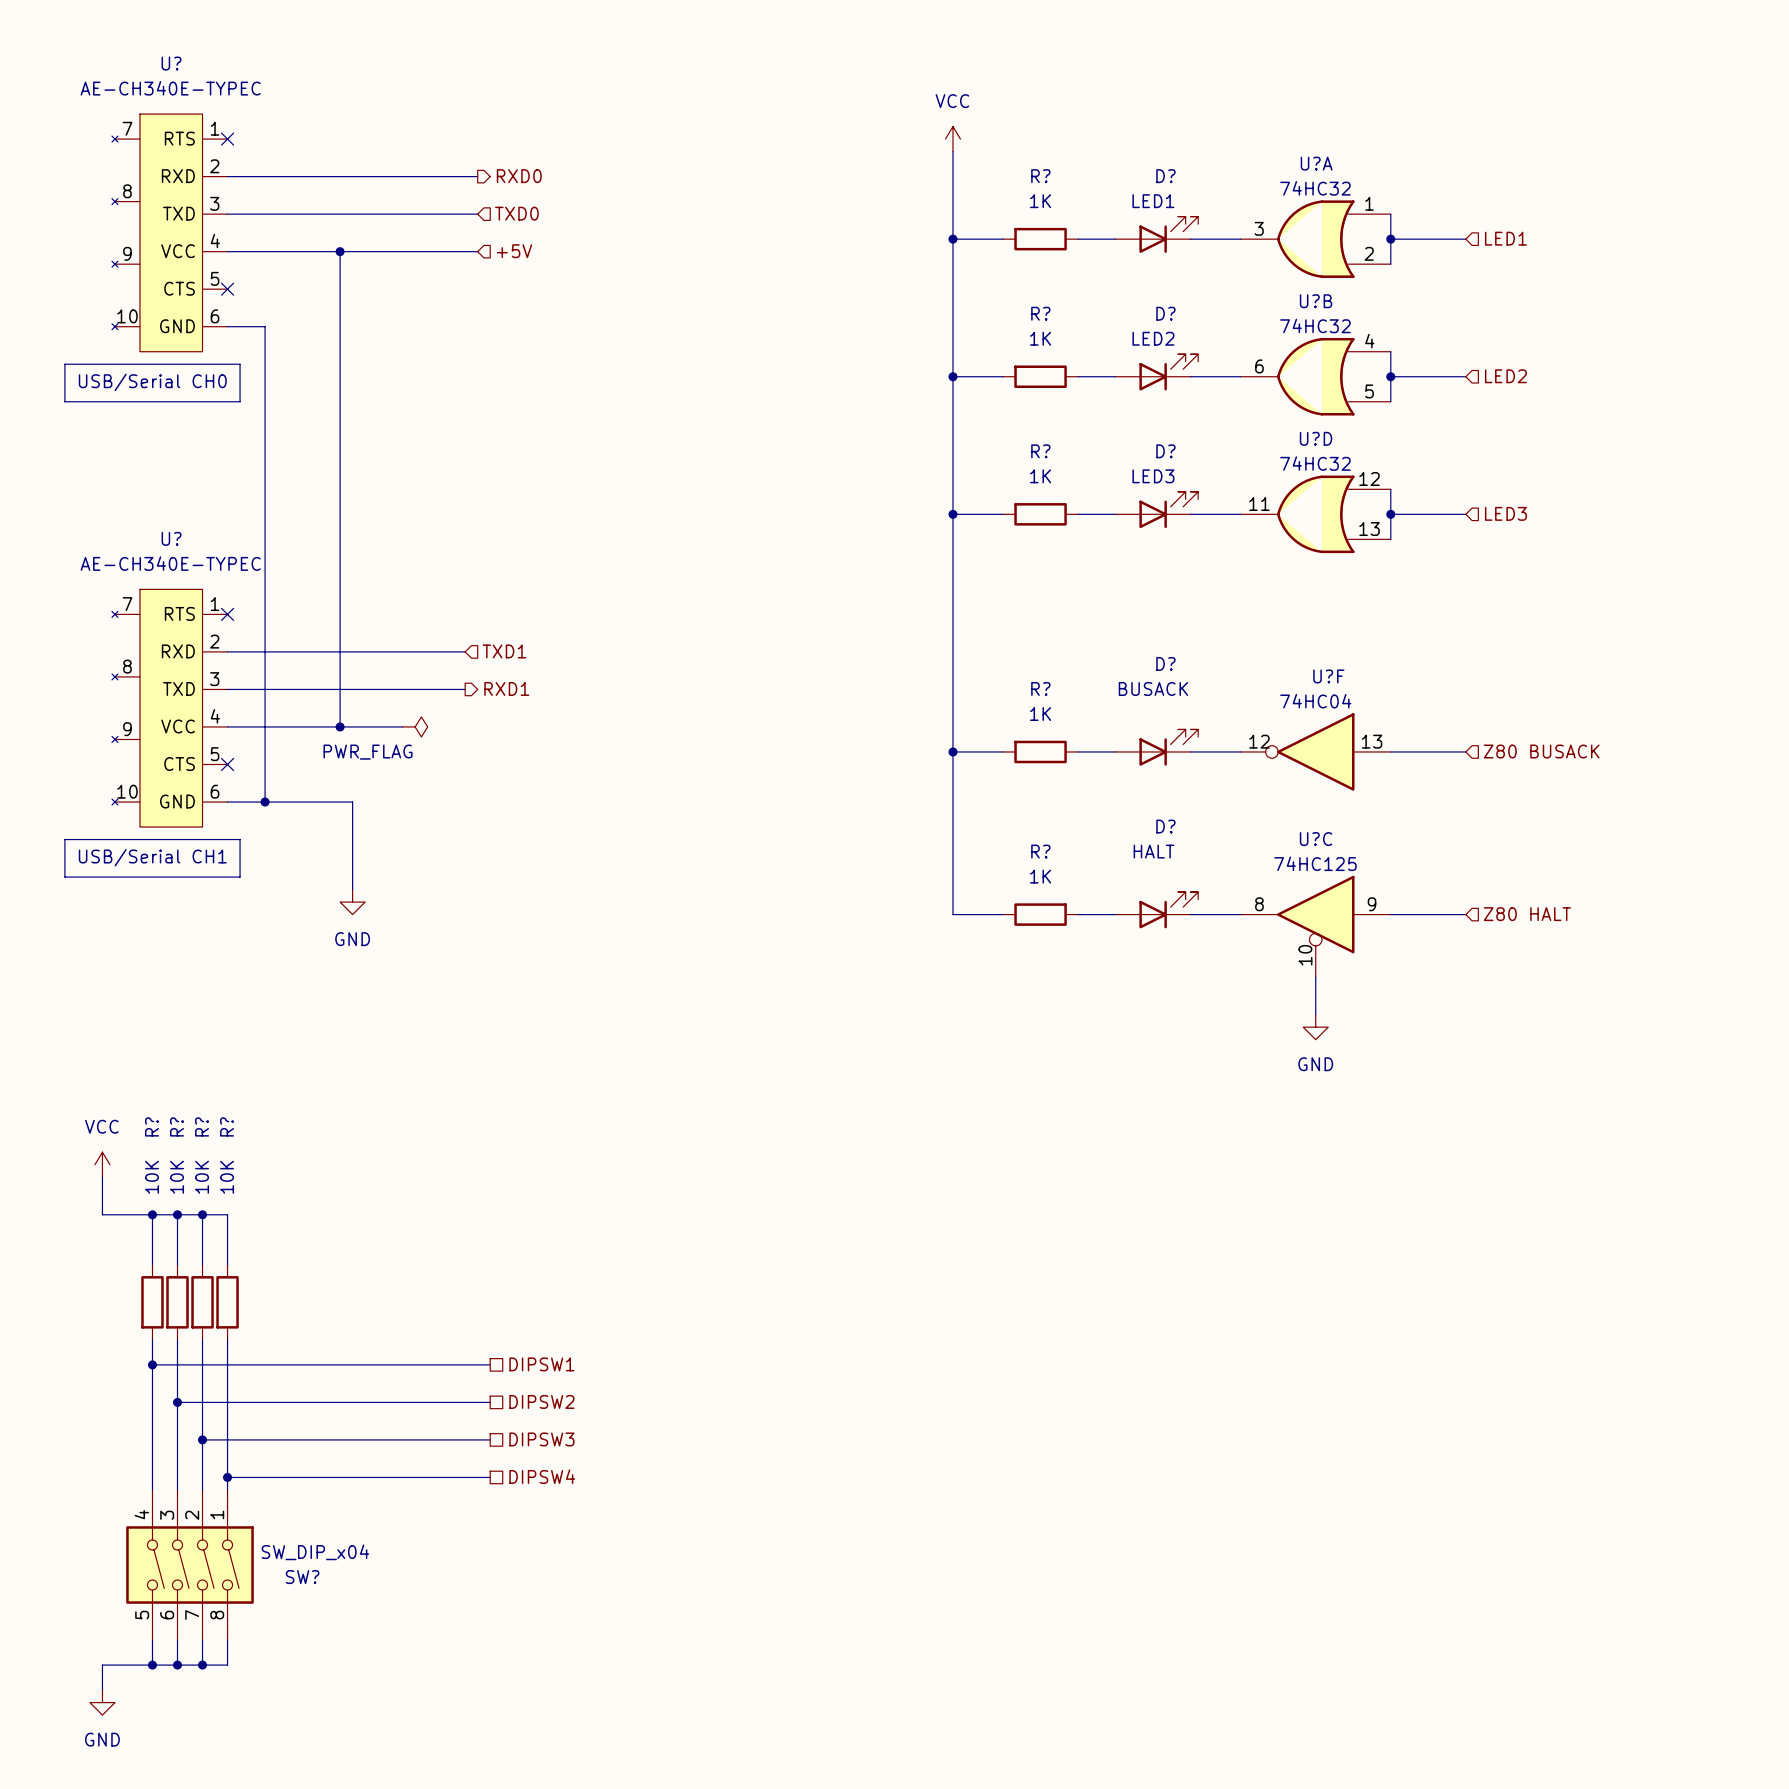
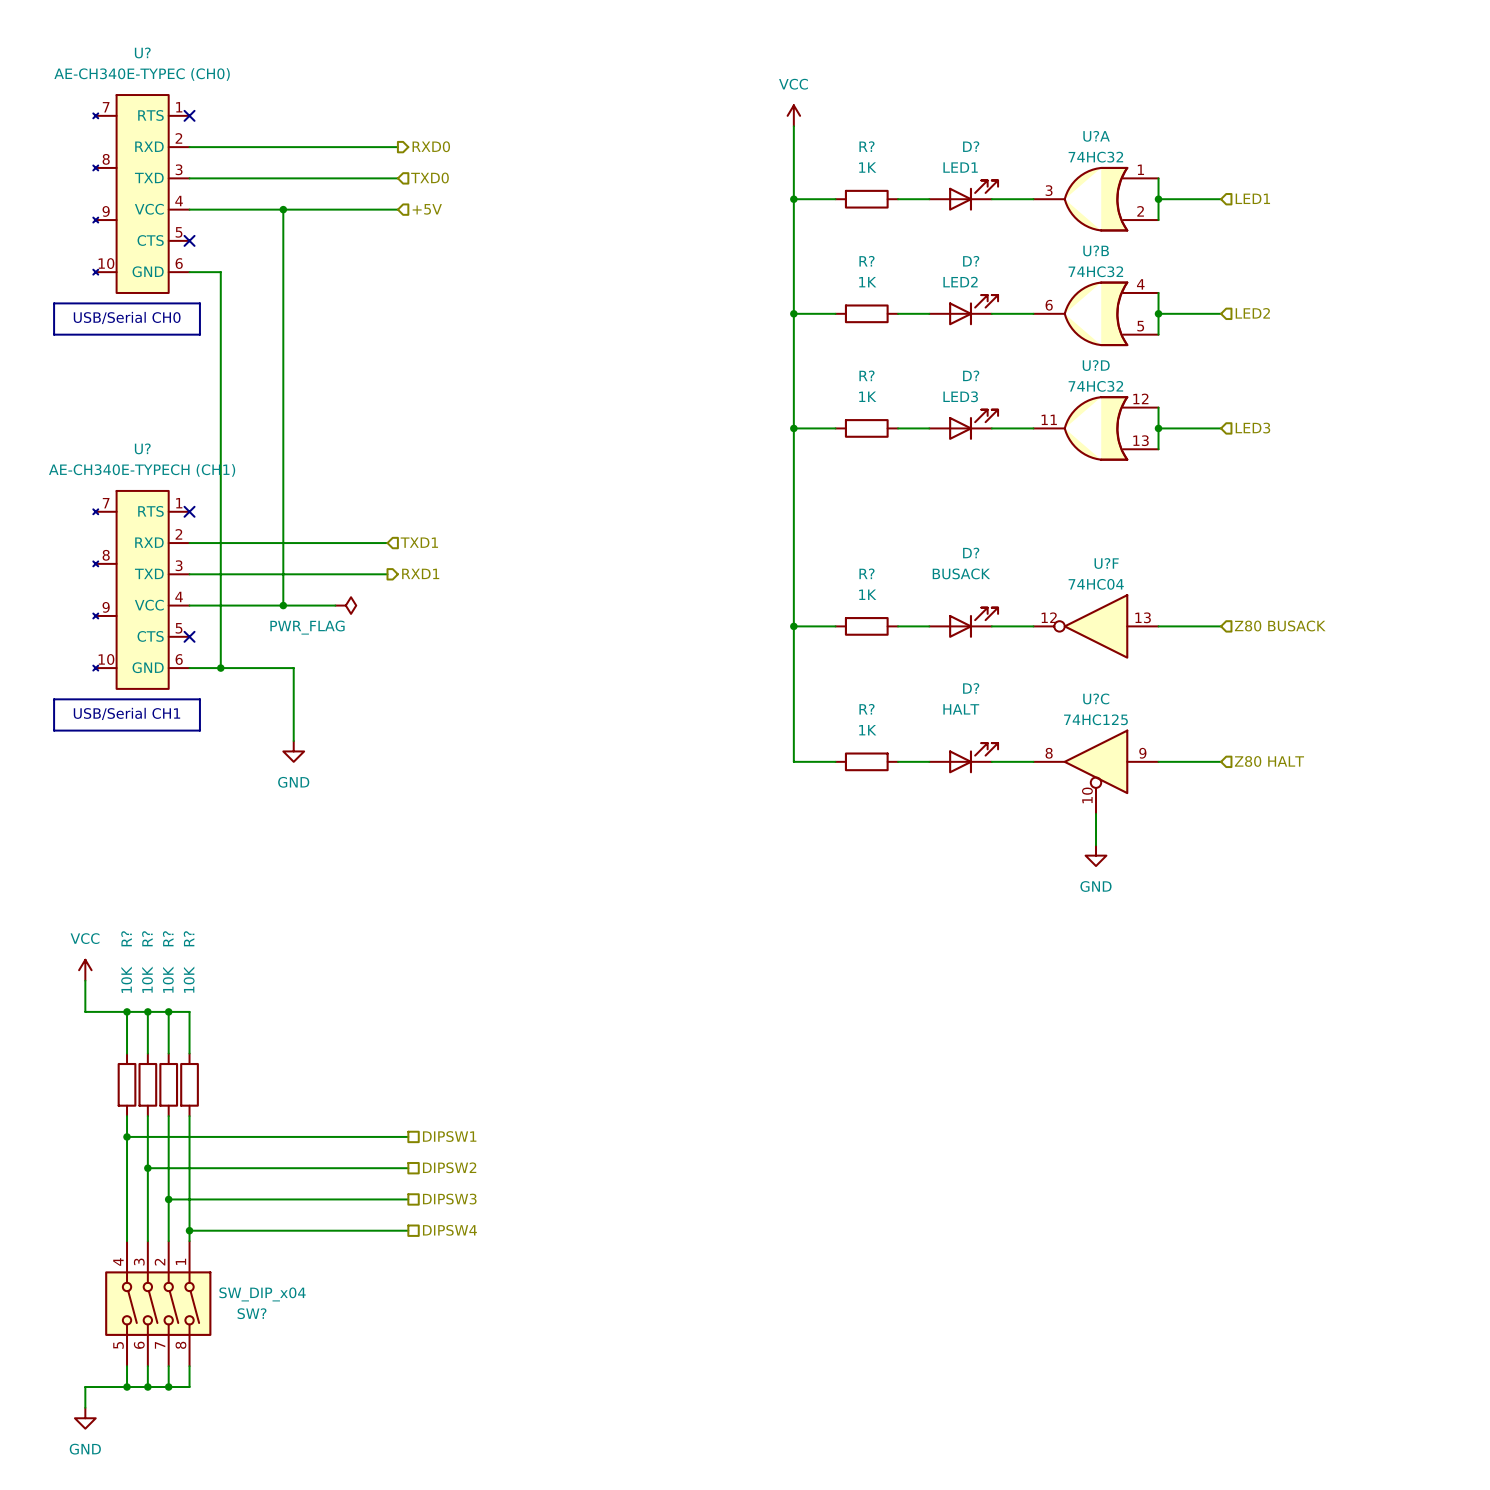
U? value: AE-CH340E-TYPEC (170, 88) -> AE-CH340E-TYPEC (CH0) (142, 74)
U? value: AE-CH340E-TYPEC (170, 563) -> AE-CH340E-TYPECH (CH1) (142, 470)

